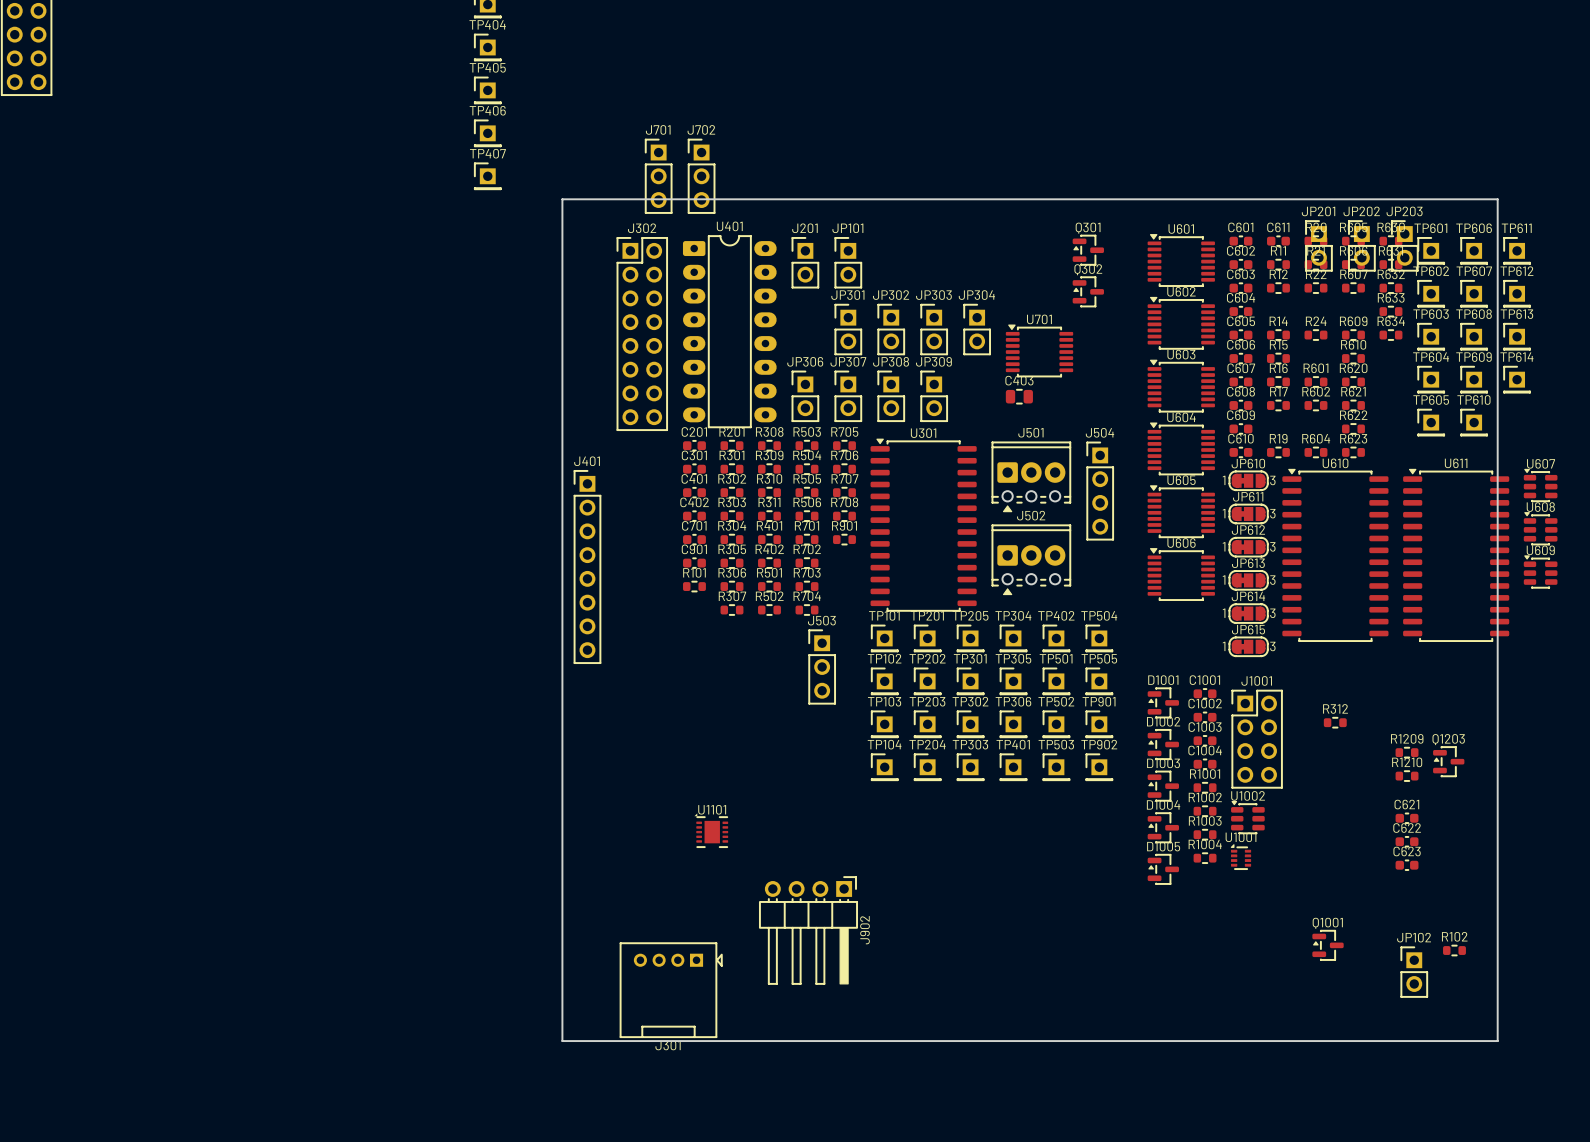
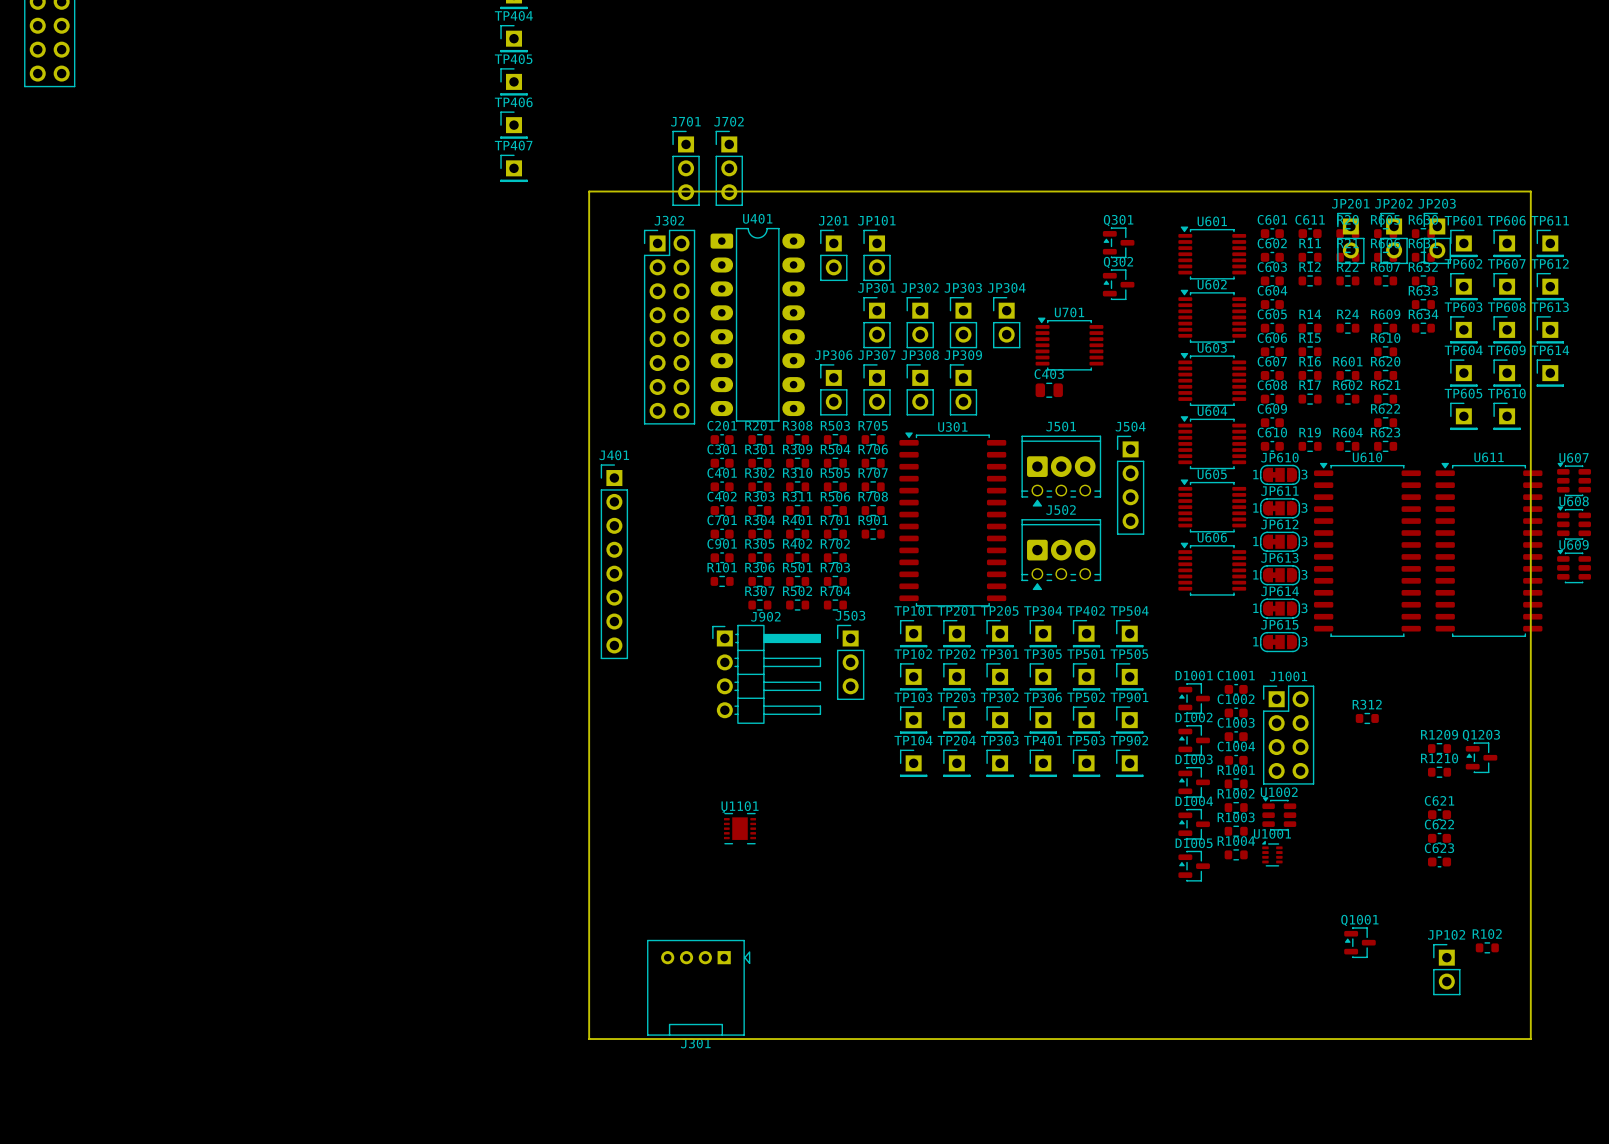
J902 rotation: 0° (808, 930) -> 90° counterclockwise (766, 674)
J902 position: (808, 930) -> (766, 674)

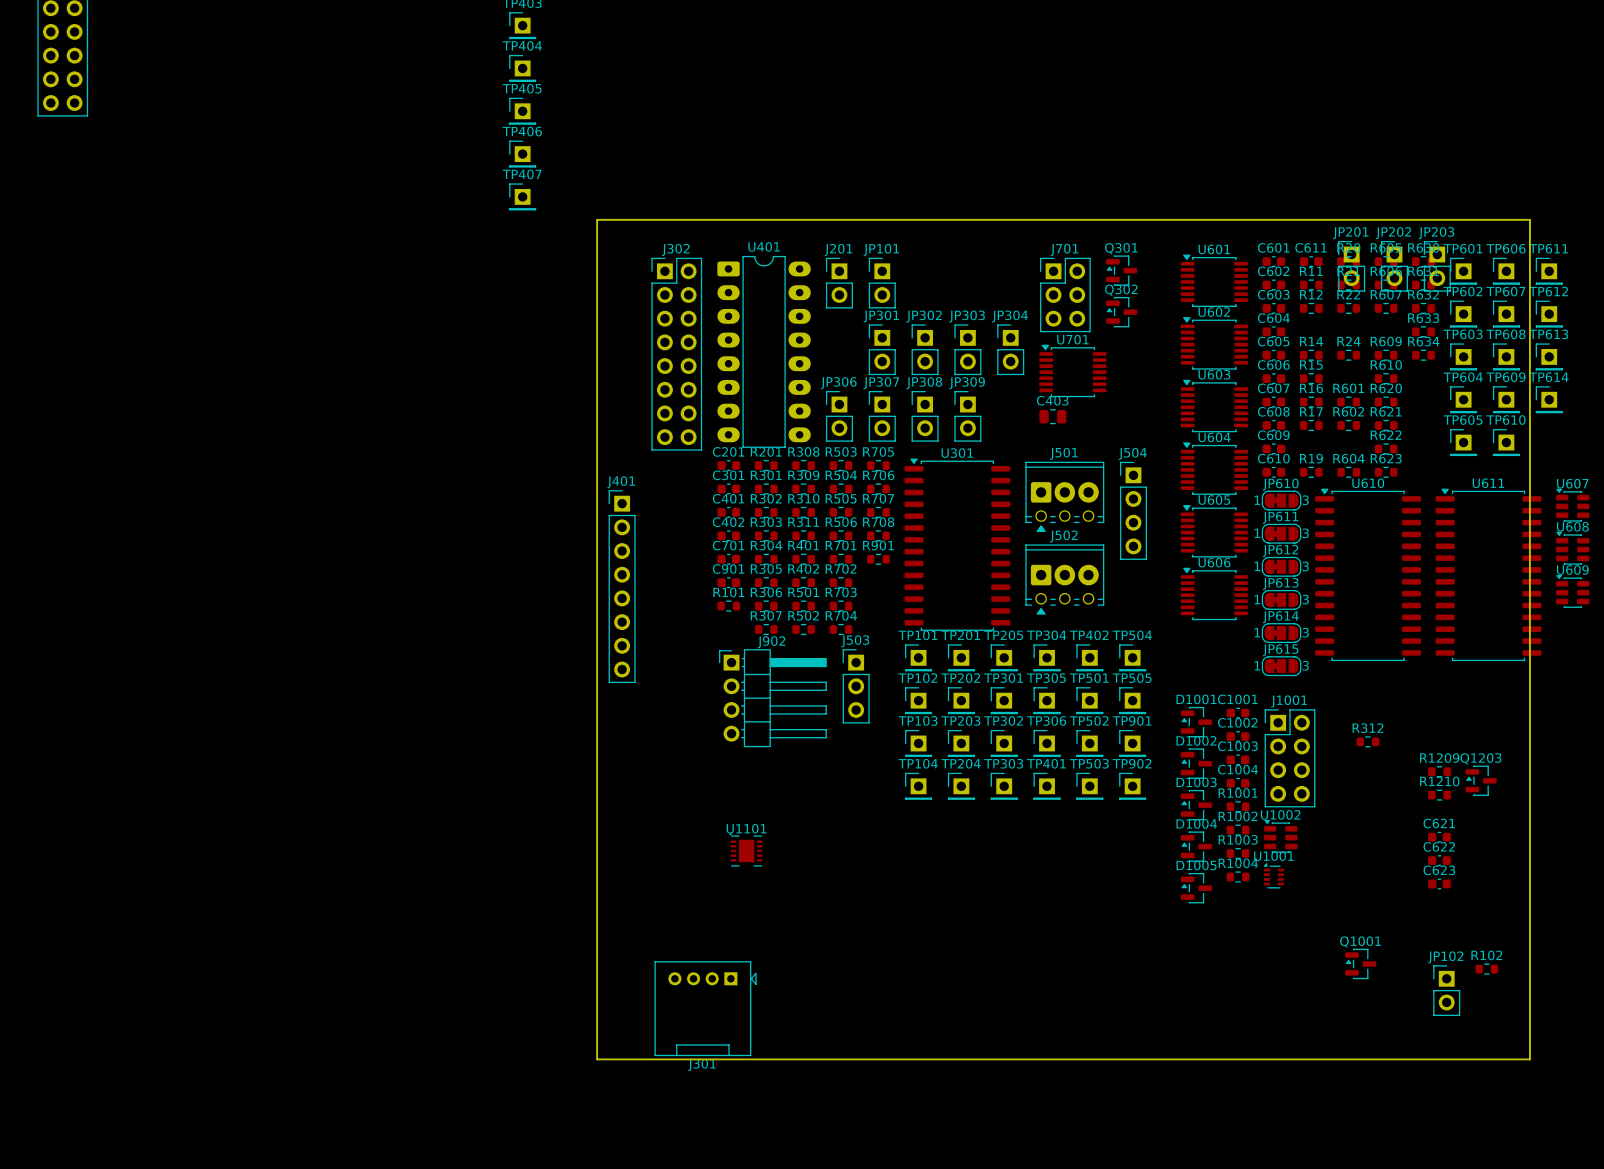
J701 footprint: [672, 130, 700, 206] -> [1040, 257, 1091, 333]
J702: (729, 168) -> none

